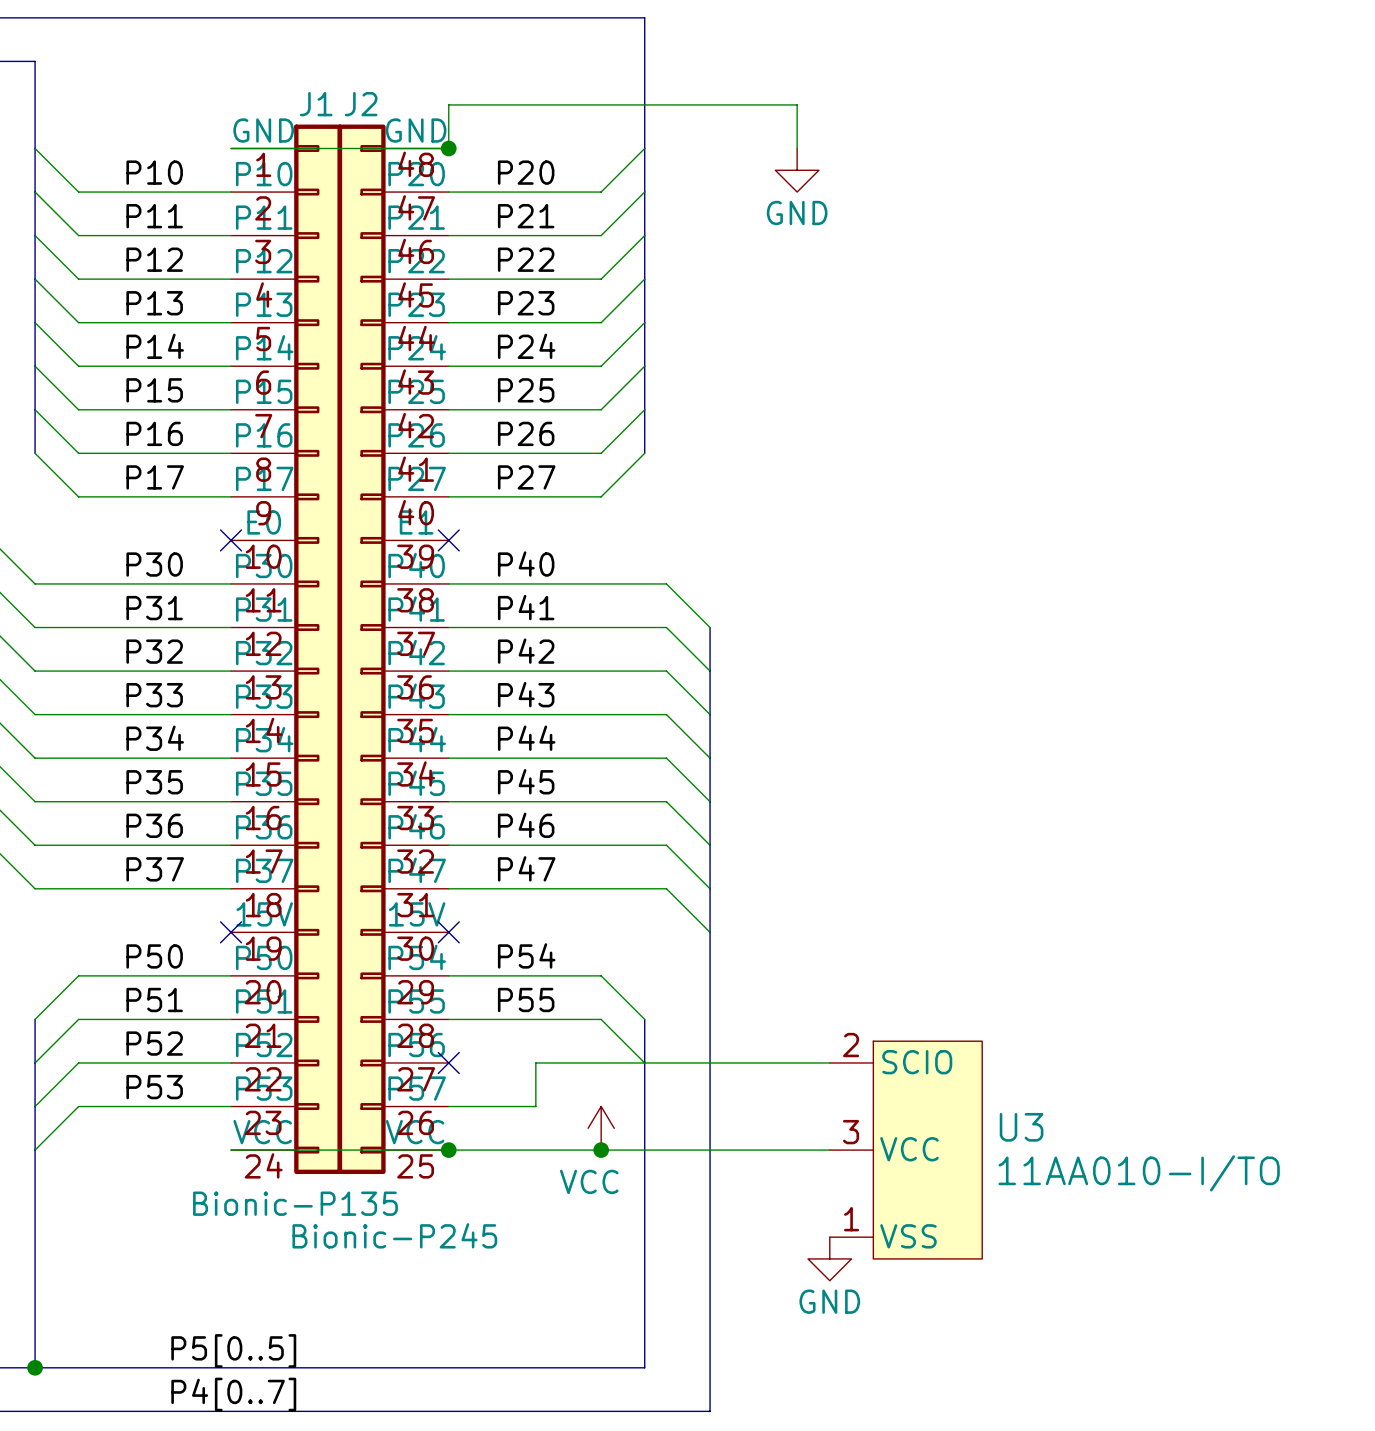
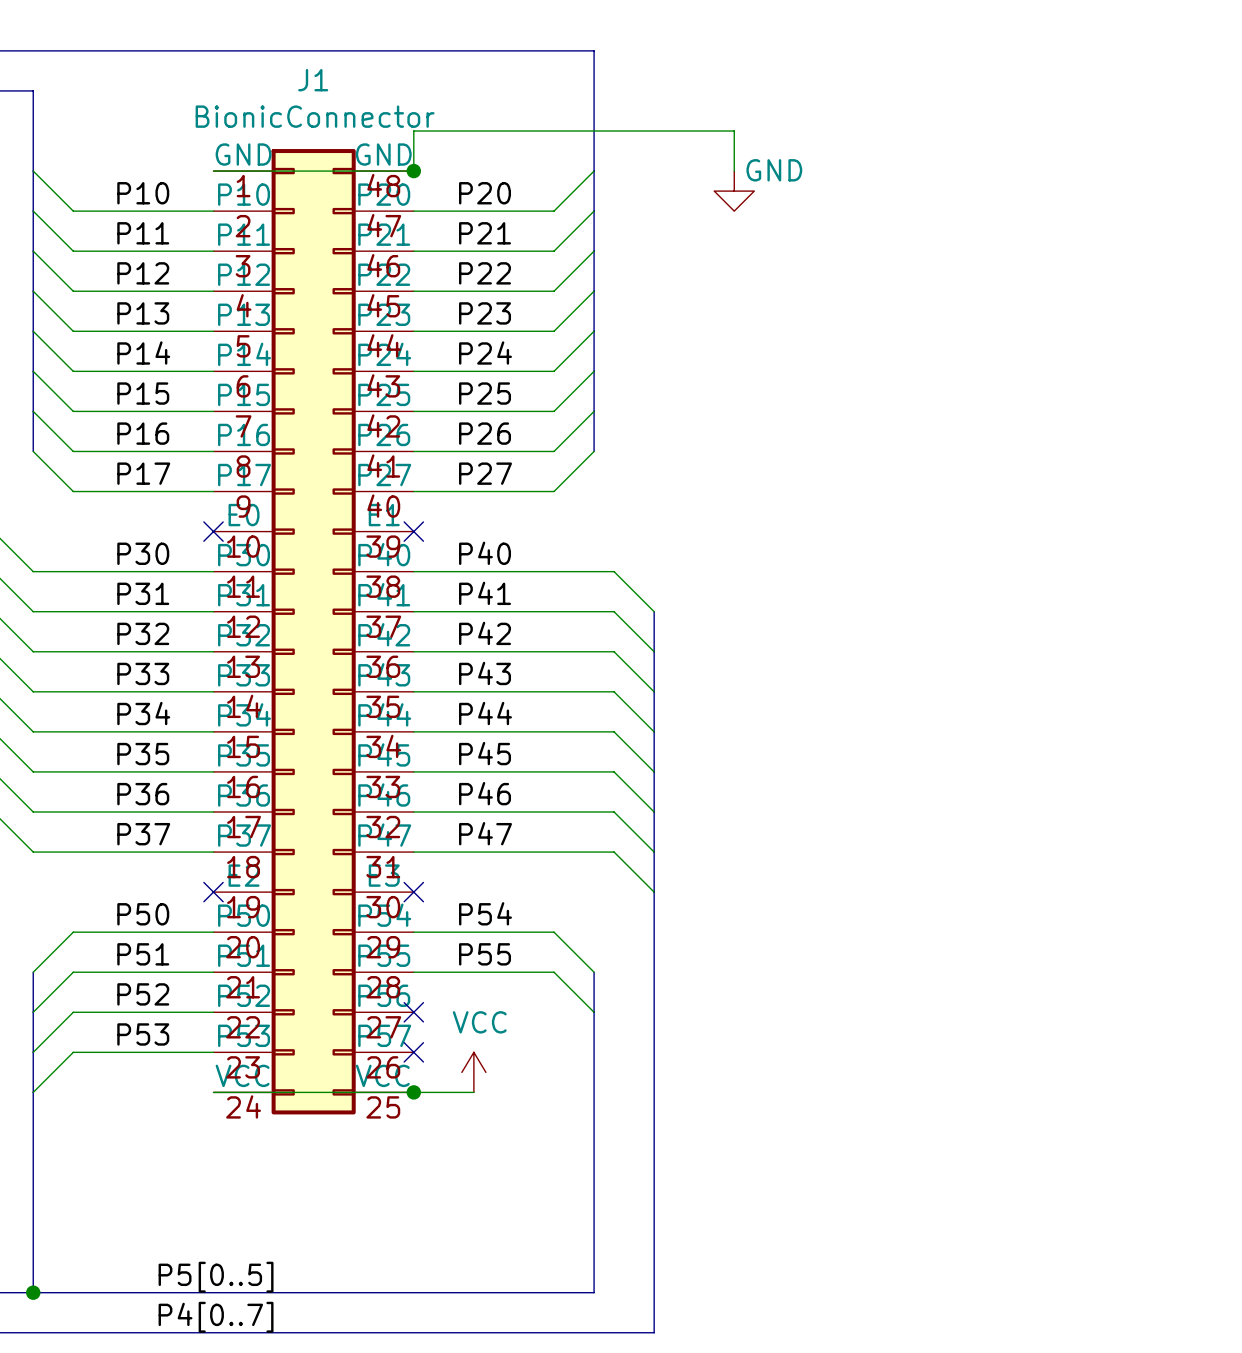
J1 name position: J1 (316, 104) -> J1 (313, 80)
J1 symbol: [231, 124, 343, 1175] -> [213, 149, 414, 1115]
power symbol text position: GND (797, 213) -> GND (774, 170)
J2: Bionic-P245 (393, 649) -> none
wire: (829, 1062) (535, 1062) (535, 1106) (448, 1106) -> none
no-connect mark: none -> (413, 1052)
power symbol position: VCC (601, 1128) -> VCC (473, 1072)
wire: (514, 1150) (829, 1150) -> none
junction: (601, 1150) -> none
U3: 11AA010-I/TO (906, 1150) -> none
power symbol text position: VCC (589, 1181) -> VCC (479, 1022)
J1 value: Bionic-P135 (295, 1203) -> BionicConnector (315, 116)
power symbol: GND (829, 1258) -> none

